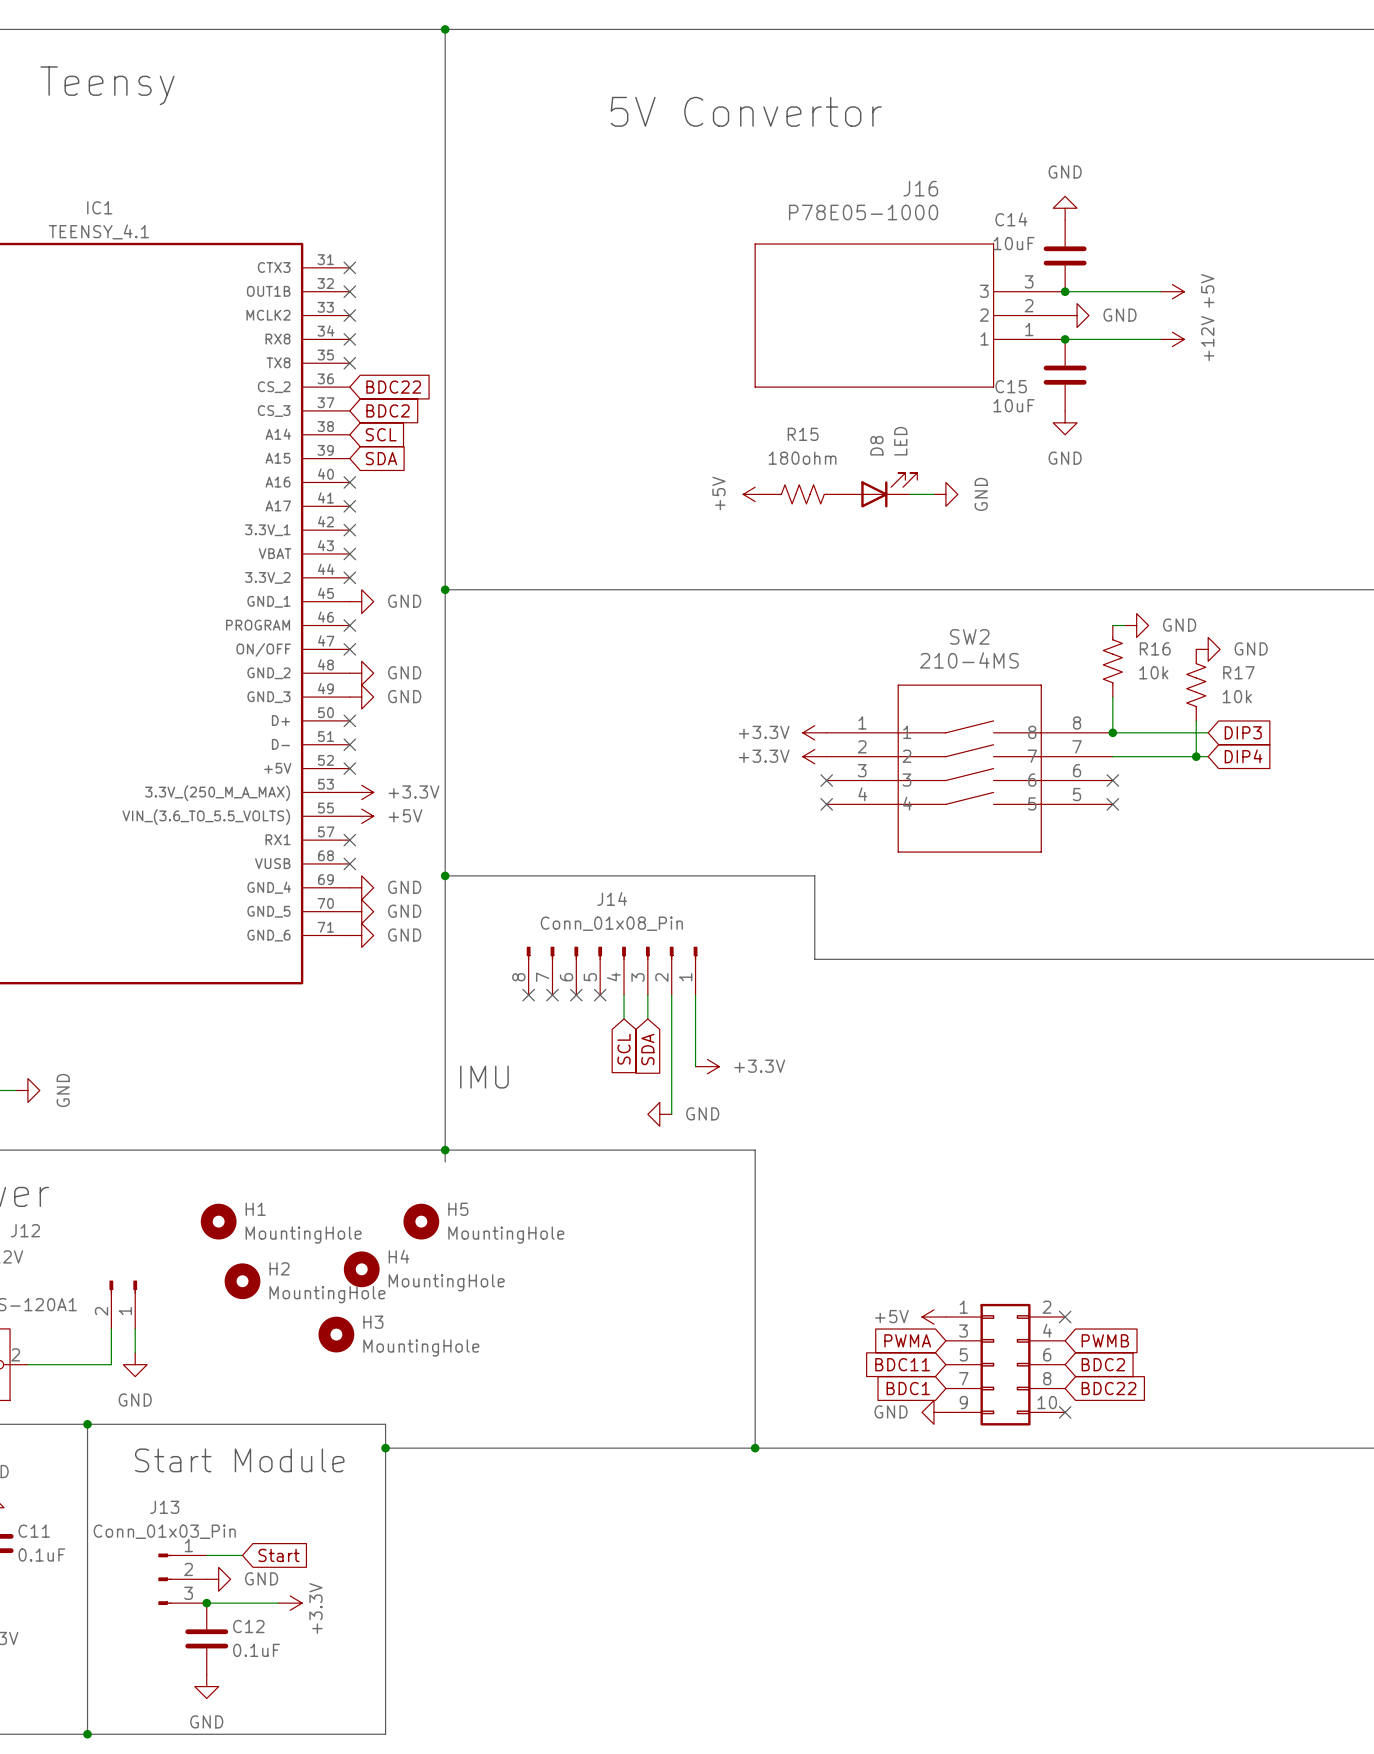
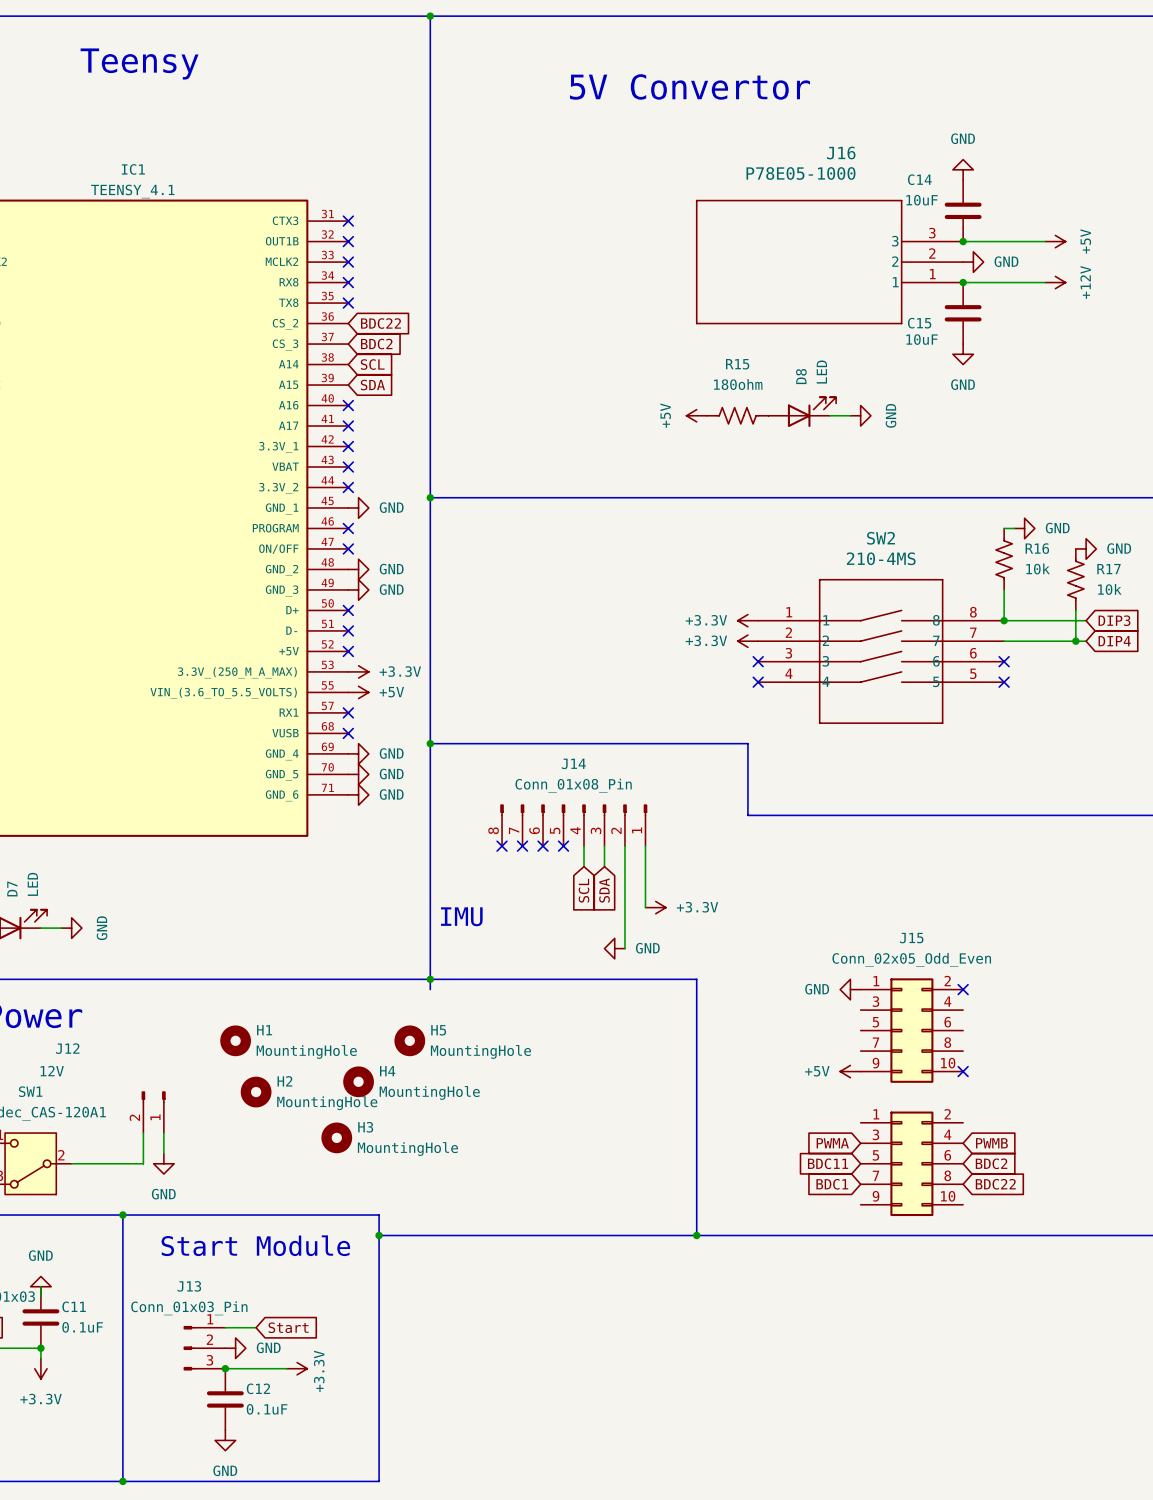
power symbol: none -> GND (850, 989)
no-connect mark: none -> (963, 989)
J15: none -> Conn_02x05_Odd_Even (911, 1030)
no-connect mark: none -> (963, 1071)
power symbol position: +5V (933, 1317) -> +5V (850, 1071)
no-connect mark: (1065, 1317) -> none
power symbol: GND (933, 1412) -> none
no-connect mark: (1065, 1412) -> none

